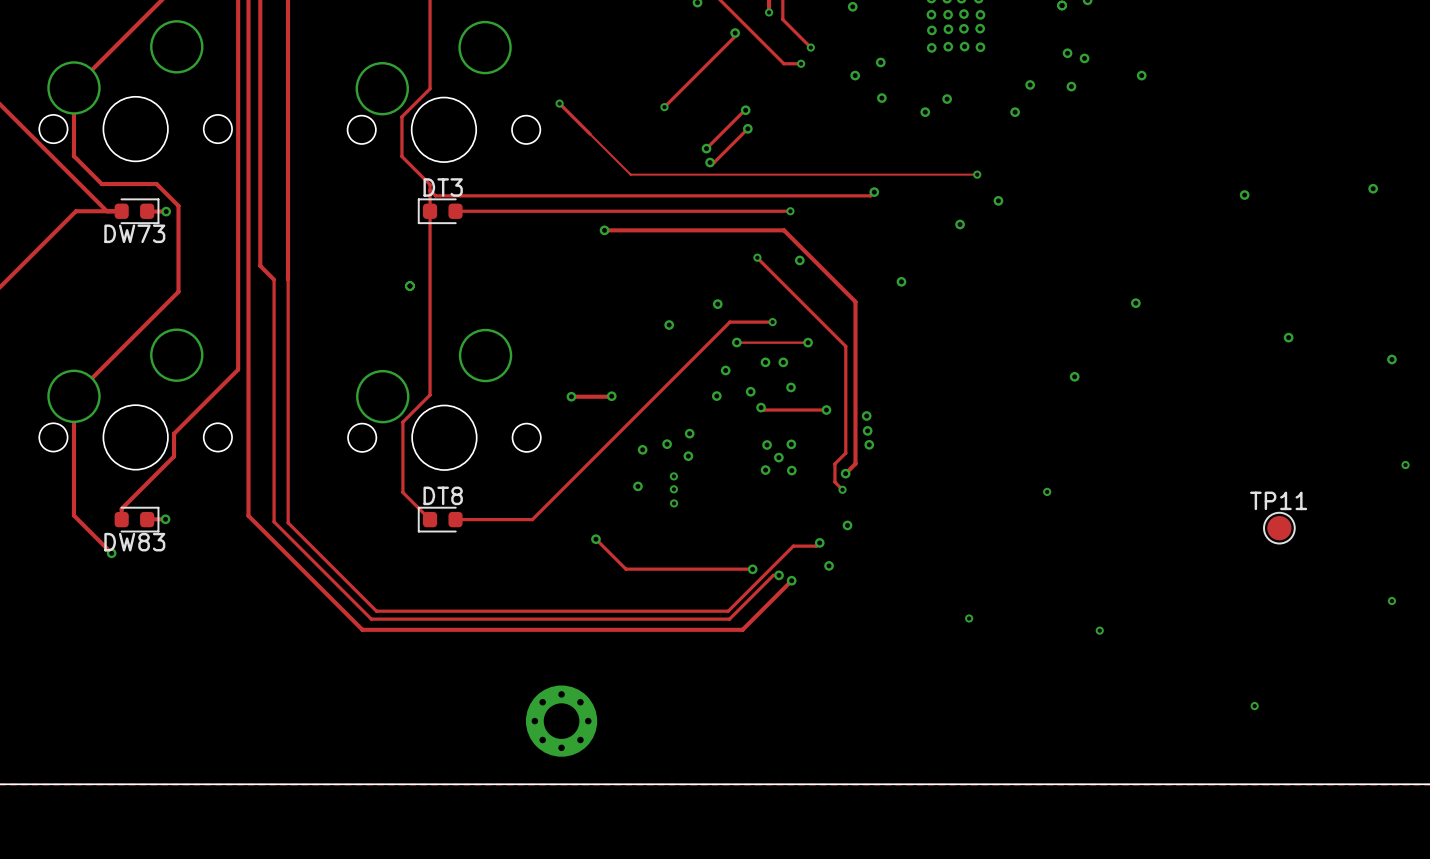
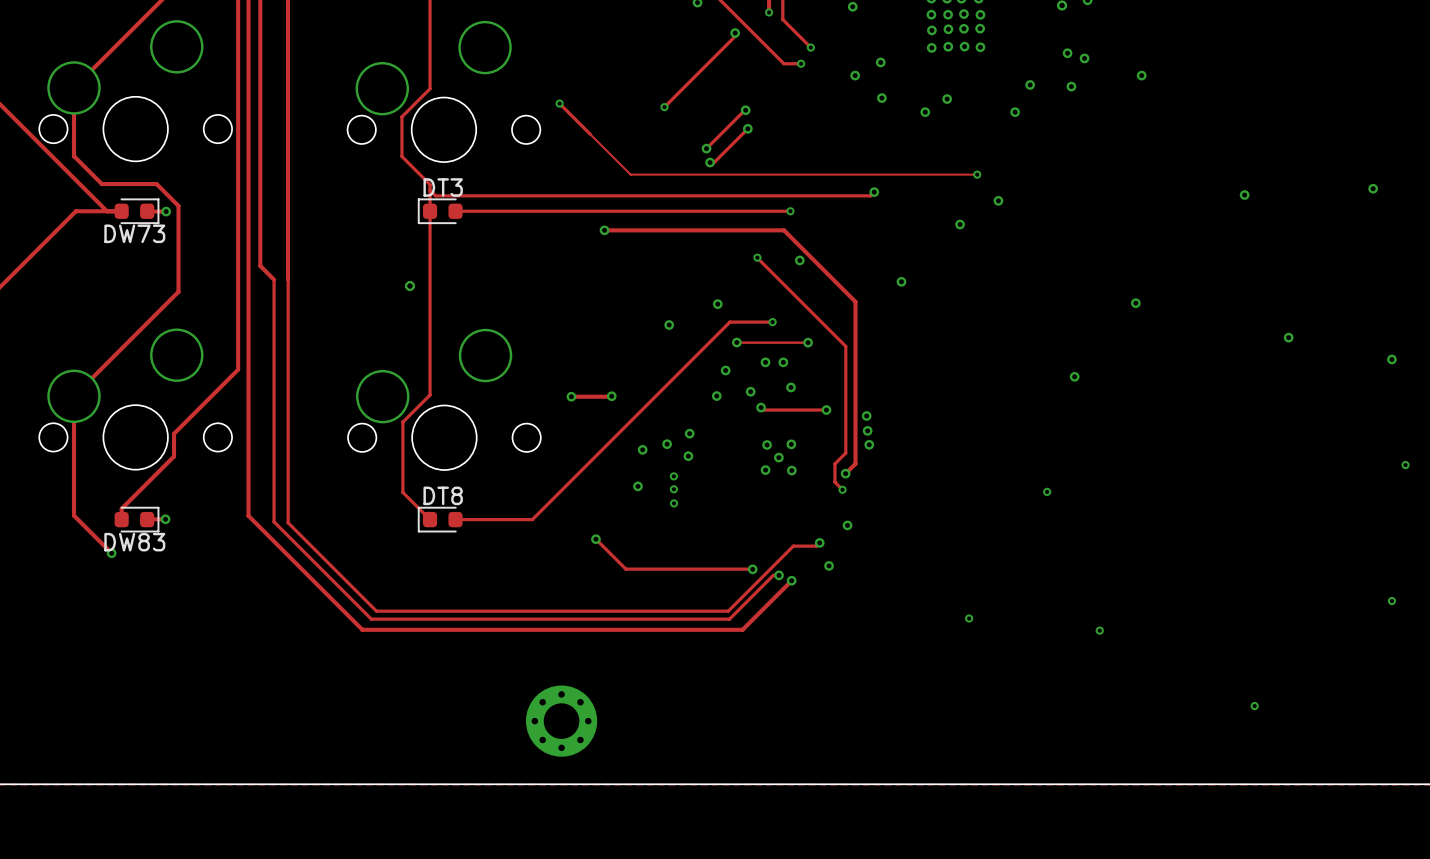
TP11: (1279, 528) -> none

